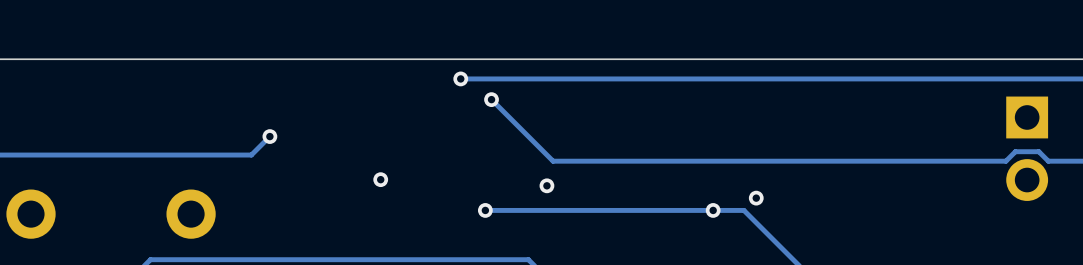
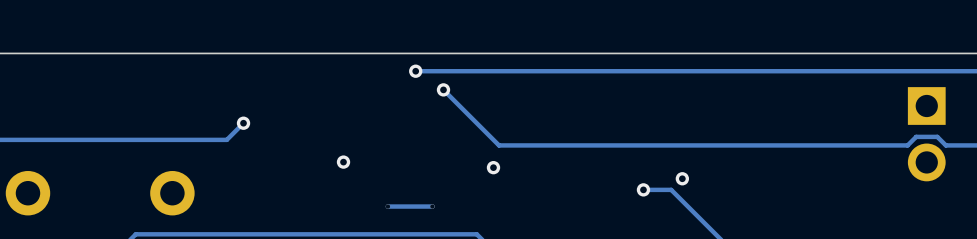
via: (485, 210) -> none
track: (713, 210) (485, 210) -> none
via: none -> (387, 206)
track: none -> (432, 206) (387, 206)
via: none -> (432, 206)

